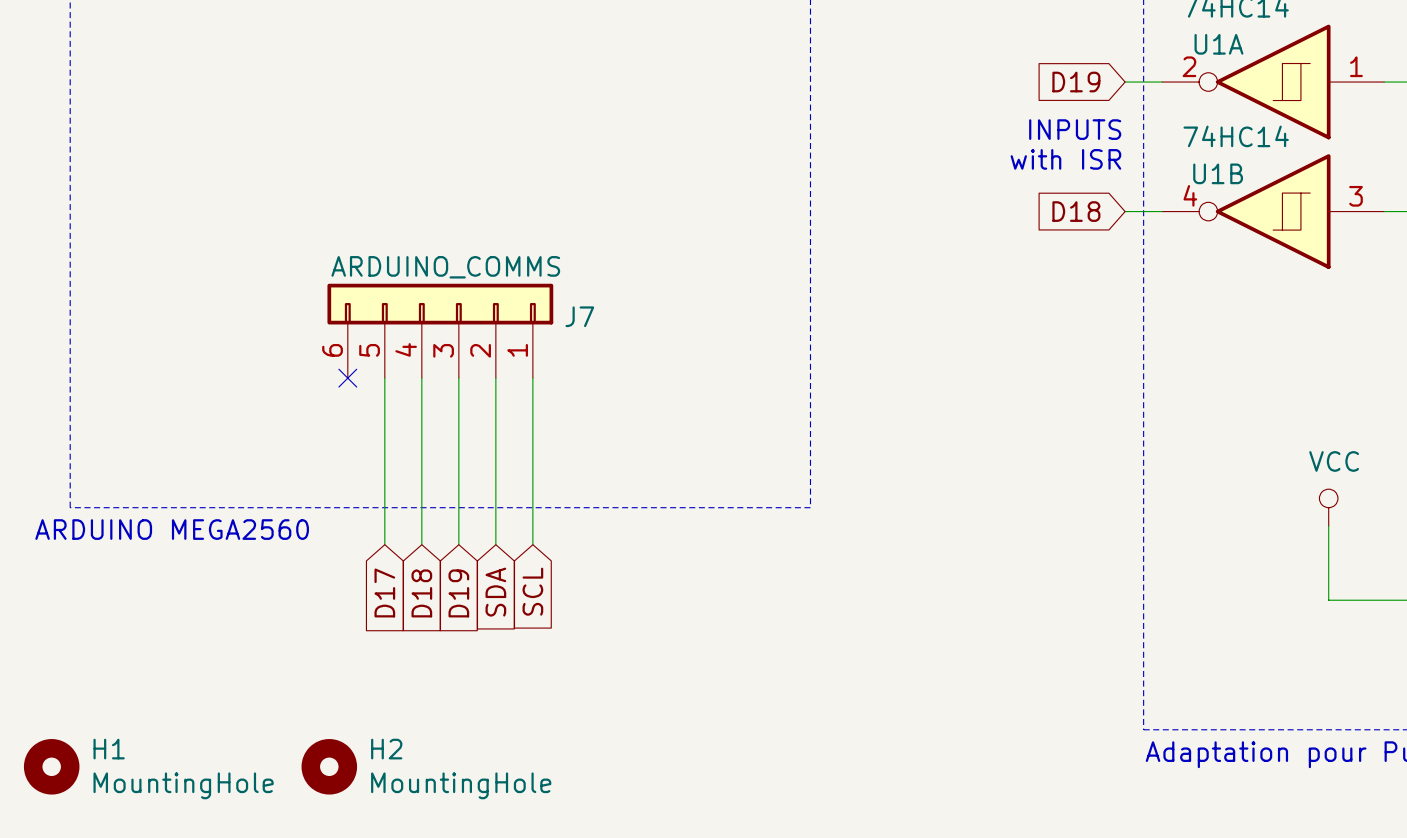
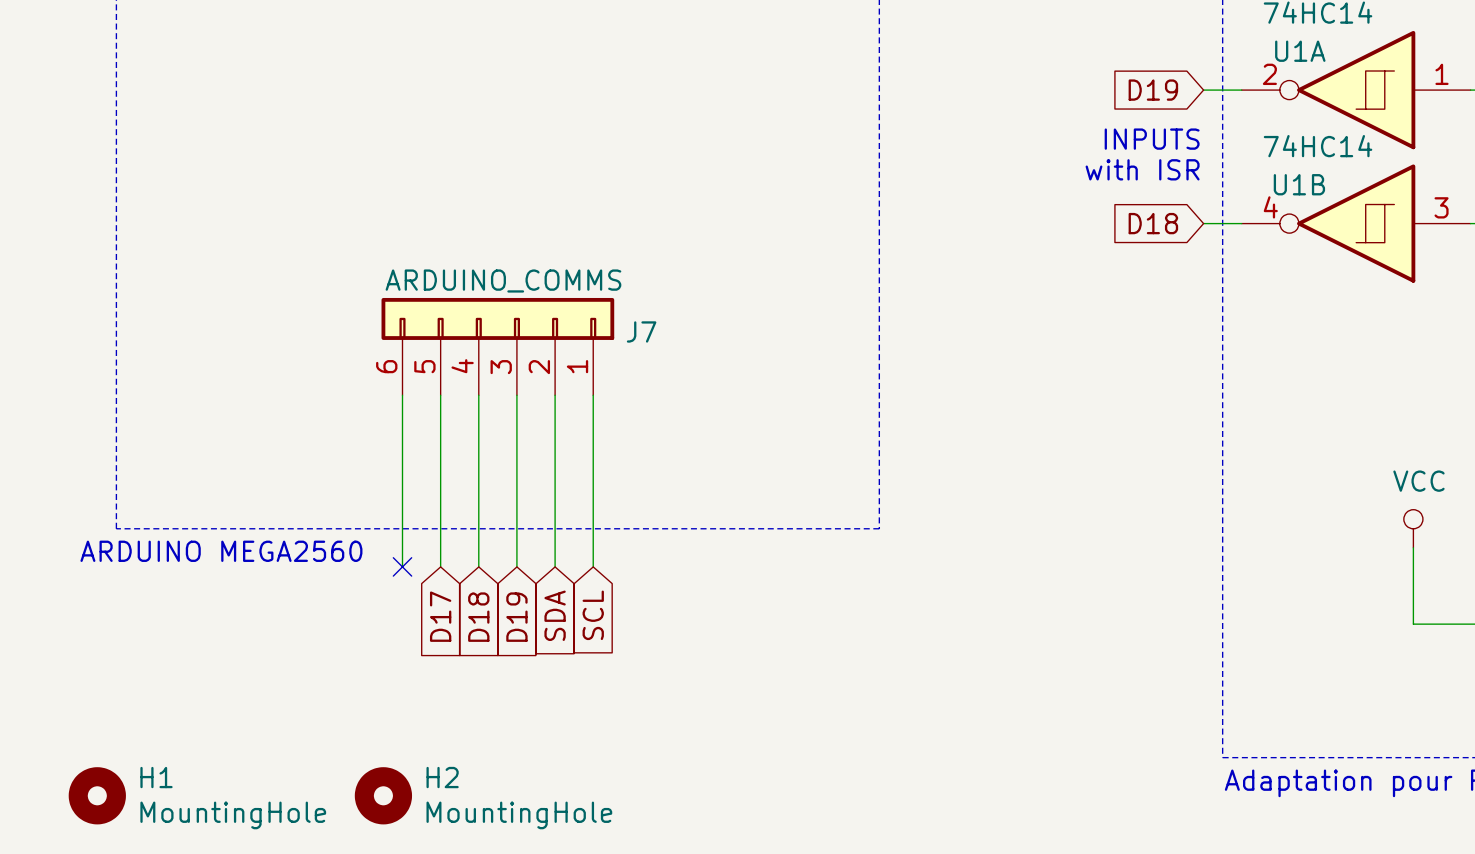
wire: none -> (402, 395) (402, 566)
no-connect mark: (347, 378) -> none
no-connect mark: none -> (402, 566)

